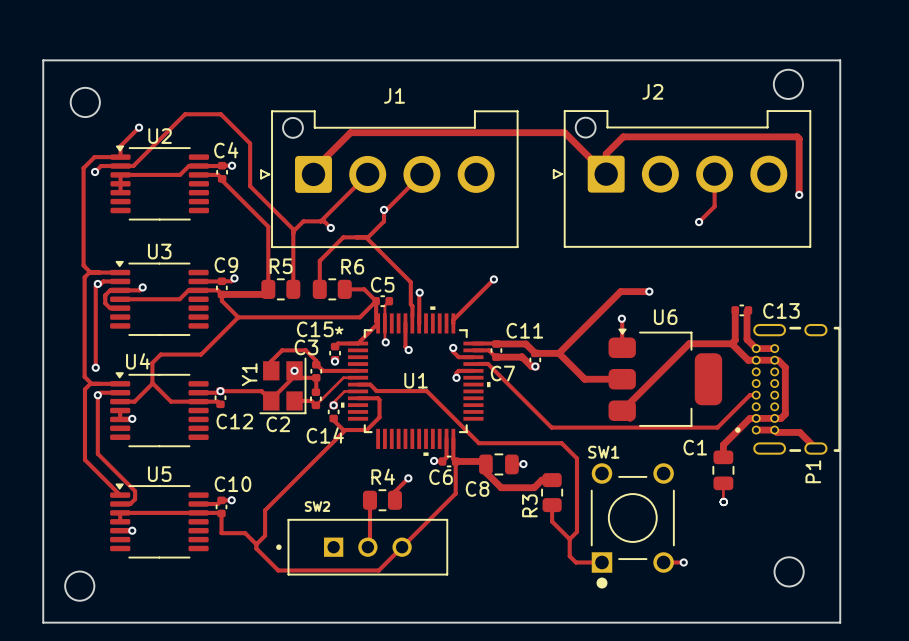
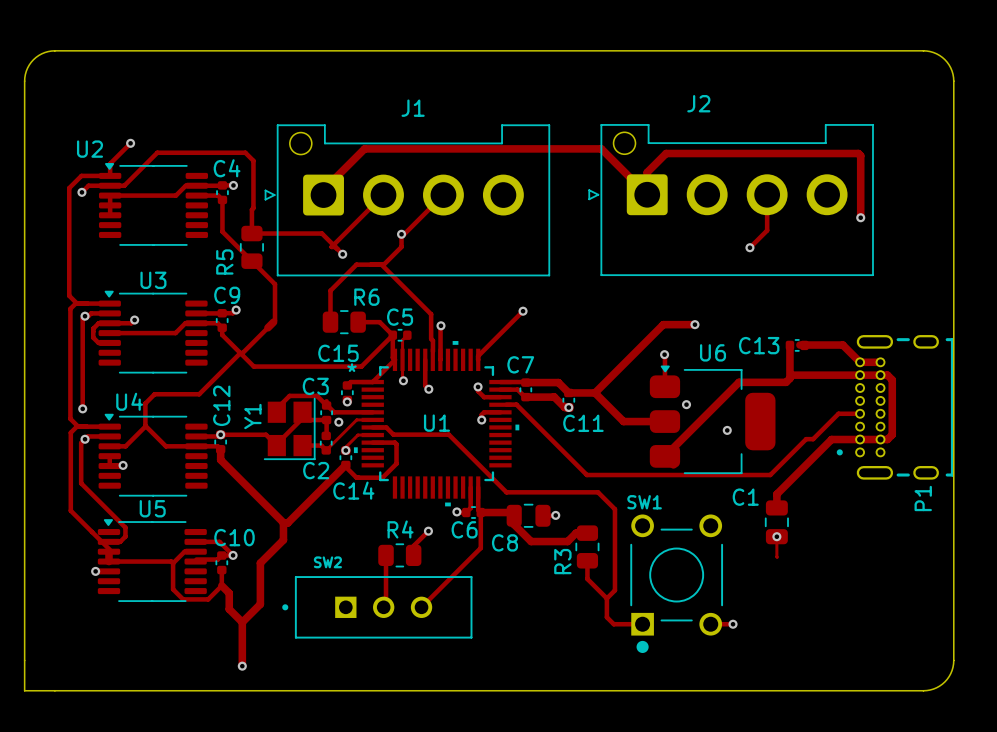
round board edge: [773, 69, 804, 100] -> none
board edge: (43, 71) (43, 60) (840, 60) (840, 622) -> (24, 81) (26, 71) (33, 59) (41, 53) (54, 50) (923, 50) (939, 55) (949, 65) (953, 81) (953, 660) (950, 673) (939, 686) (926, 690) (906, 690)
round board edge: [70, 87, 101, 118] -> none
text: none -> U2 (90, 149)
U2 name: U2 (160, 136) -> none
track: (163, 136) (185, 114) (220, 114) (242, 136) -> (157, 152) (245, 152)
track: (222, 180) (268, 226) (268, 289) -> (222, 201) (222, 231) (275, 284) (273, 322)
track: (250, 186) (293, 229) (293, 289) -> (253, 208) (251, 233) (321, 233) (335, 246)
track: (320, 221) (303, 221) (293, 231) -> none
R5 name position: R5 (281, 266) -> R5 (224, 261)
R5 rotation: 0° (280, 289) -> 90° clockwise (251, 247)
R5 position: (280, 289) -> (251, 247)
track: (221, 294) (263, 294) -> (242, 353) (267, 327)
track: none -> (799, 345) (842, 345) (860, 362) (880, 362)
track: (748, 310) (747, 339) (756, 348) (774, 348) -> none
C13 name position: C13 (781, 310) -> C13 (759, 345)
track: (240, 317) (359, 317) -> (240, 353) (253, 366) (361, 366) (374, 353)
C15 name position: C15 (315, 329) -> C15 (338, 353)
C11 name position: C11 (524, 330) -> C11 (583, 423)
track: (731, 343) (748, 360) (778, 360) (785, 367) (785, 414) (780, 418) (749, 418) -> (793, 375) (887, 375) (892, 379) (892, 434) (887, 439) (831, 439) (806, 464)
track: (316, 360) (305, 350) (282, 350) (271, 361) (271, 370) -> none
via: none -> (686, 404)
track: none -> (326, 405) (317, 395) (289, 395) (275, 411)
via position: (294, 370) -> (338, 422)
track: none -> (860, 413) (838, 413) (813, 439)
C7 name position: C7 (502, 373) -> C7 (520, 364)
via: none -> (727, 430)
P1 position: (788, 389) -> (895, 407)
track: (97, 395) (97, 453) (135, 491) (135, 499) (130, 504) (120, 504) -> (85, 439) (81, 443) (81, 483) (125, 527) (125, 536) (120, 541) (108, 541)
track: none -> (220, 449) (220, 459) (283, 522) (283, 540) (260, 563) (260, 604) (242, 622)
track: none -> (345, 464) (287, 523) (283, 523)
C12 name rotation: 0° (234, 421) -> 90° counterclockwise (221, 405)
C12 name position: C12 (234, 421) -> C12 (221, 405)
C2 name position: C2 (278, 424) -> C2 (316, 470)
track: (345, 430) (265, 510) (265, 535) (256, 544) -> none
track: (756, 430) (799, 432) (815, 448) -> none
C14 name position: C14 (325, 435) -> C14 (353, 490)
track: none -> (195, 541) (219, 541) (233, 555)
track: none -> (108, 551) (108, 561) (171, 561) (173, 563)
track: none -> (195, 551) (184, 551) (173, 563)
via position: (723, 501) -> (776, 536)
track: none -> (173, 563) (173, 589) (183, 599) (208, 599) (221, 585) (229, 593) (229, 609) (242, 622)
track: (220, 512) (120, 512) (120, 521) -> none
U5 position: (159, 520) -> (152, 560)
track: (221, 527) (221, 533) (245, 533) (256, 544) -> none
via position: (132, 530) -> (95, 571)
track: (256, 544) (256, 548) (278, 570) (378, 570) (402, 547) -> none
round board edge: [774, 556, 805, 587] -> none
track: none -> (242, 622) (242, 666)
round board edge: [64, 571, 95, 602] -> none
via: none -> (242, 666)

